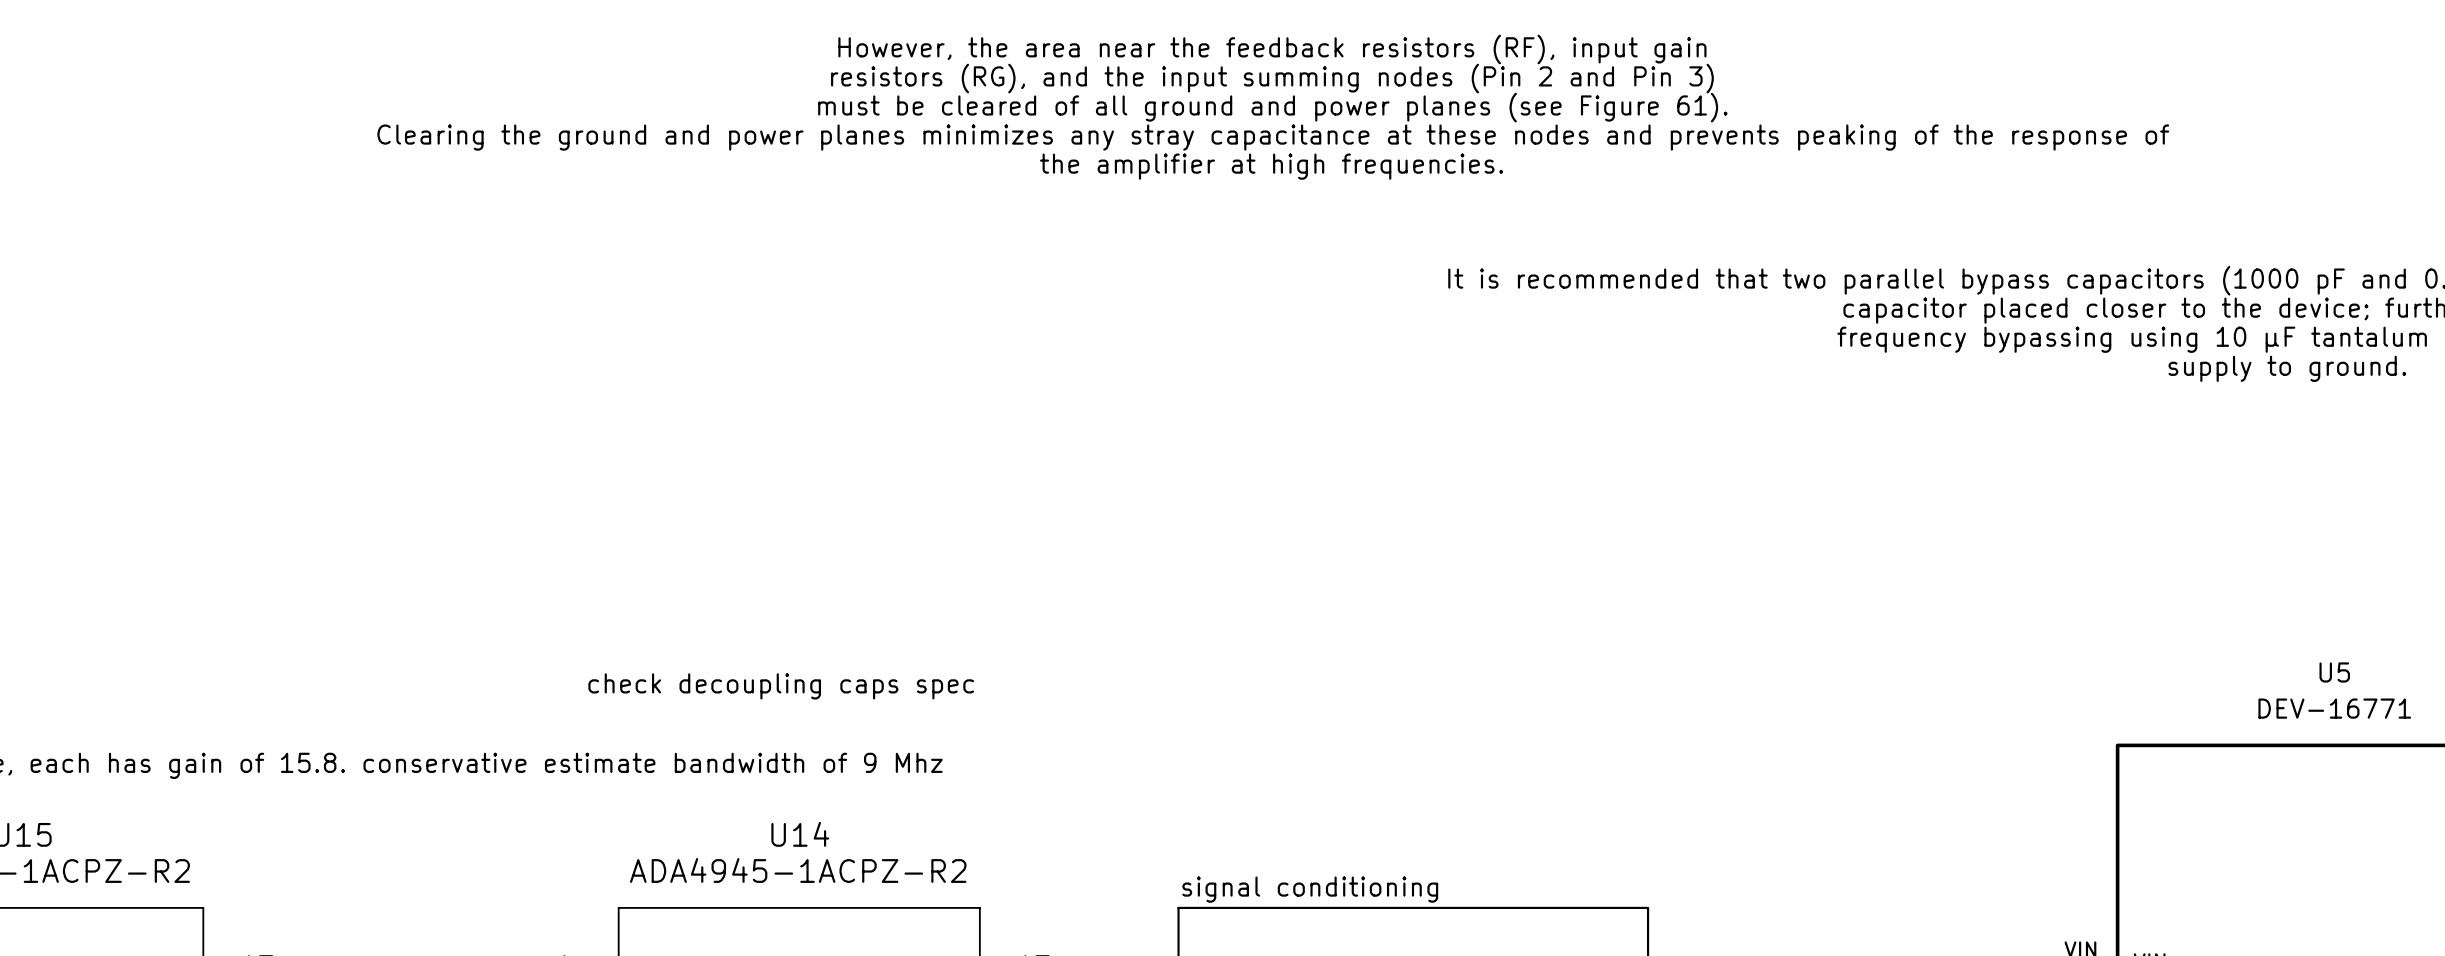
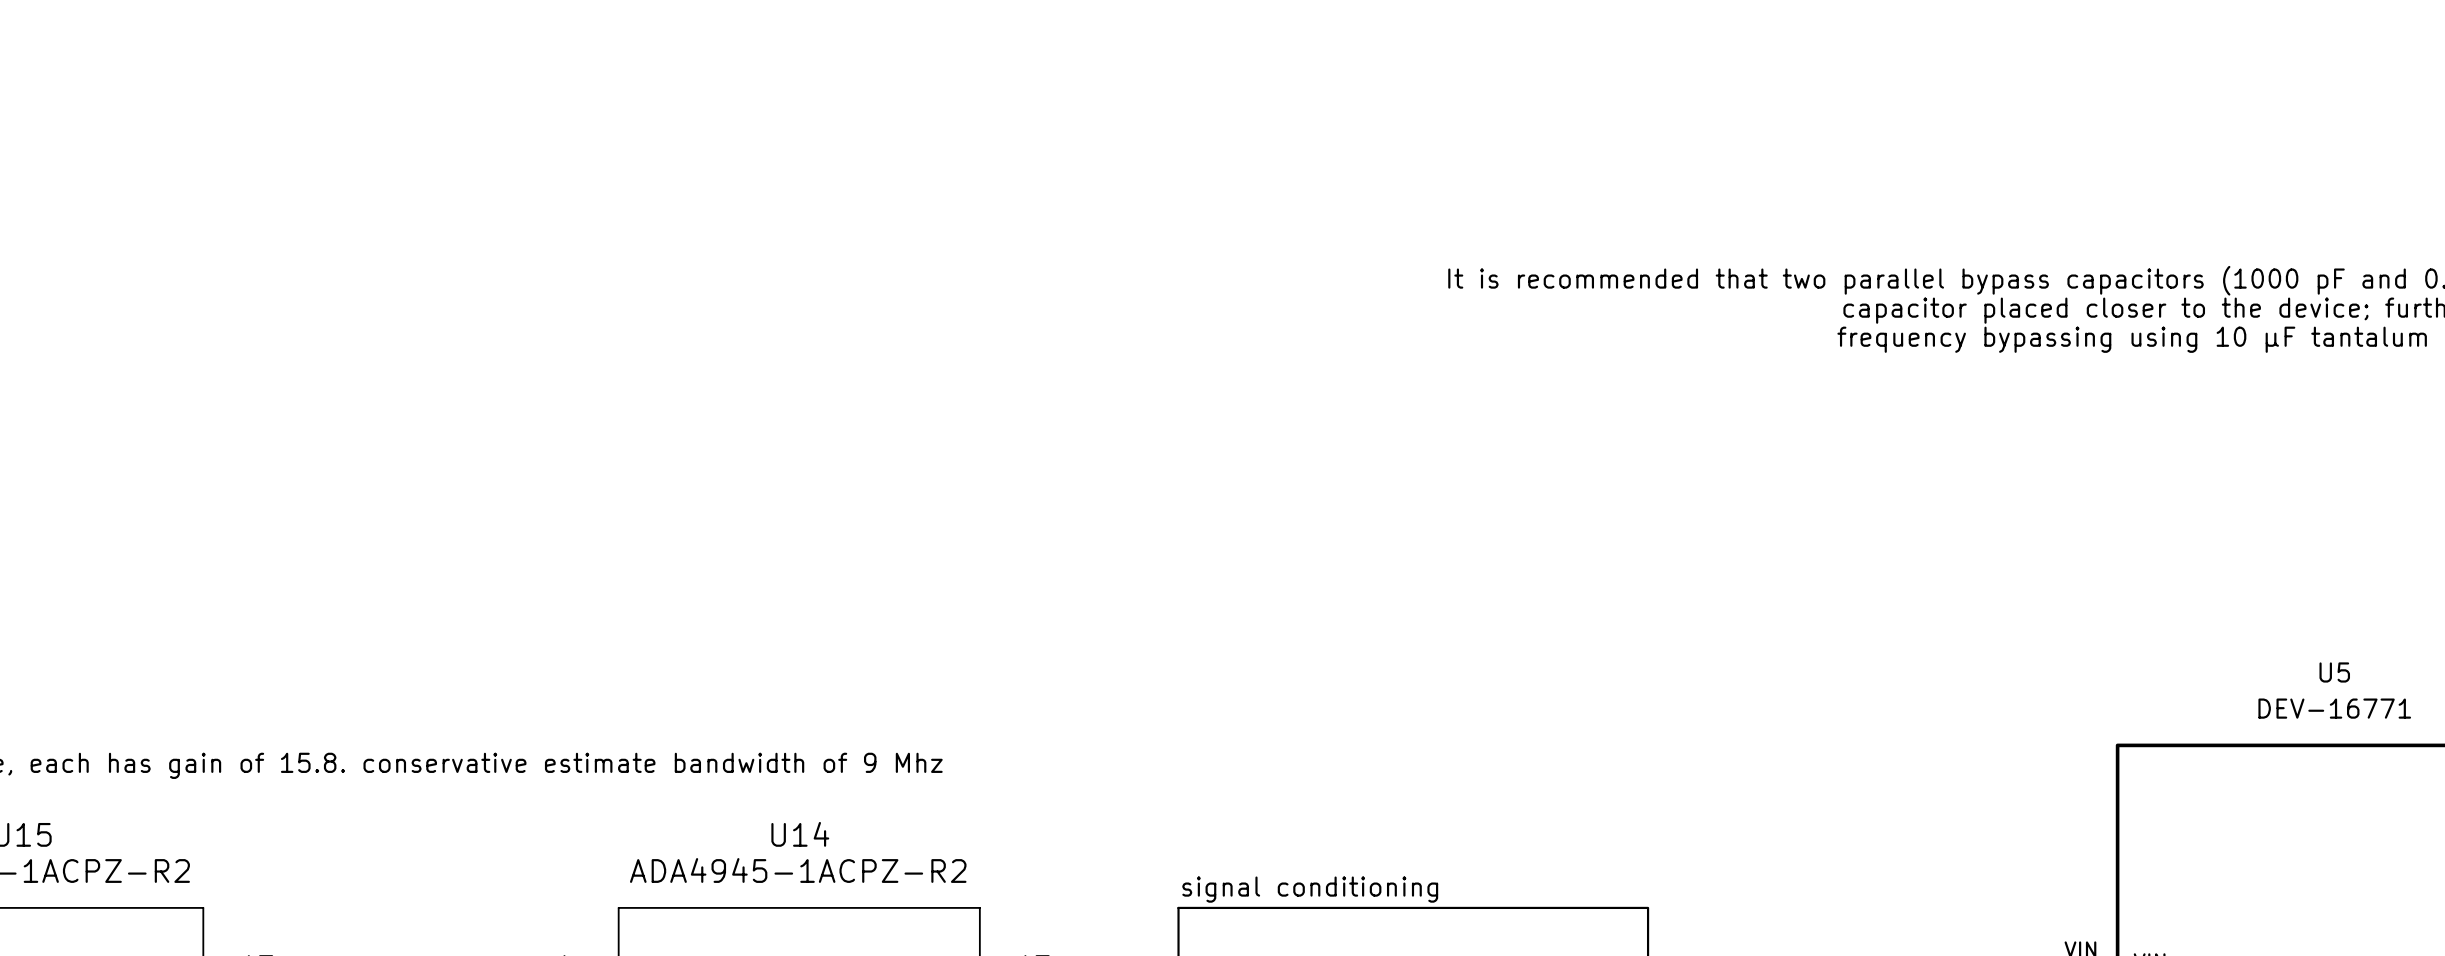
text: However, the area near the feedback resistors (RF), input gain (1272, 49) -> none
text: resistors (RG), and the input summing nodes (Pin 2 and Pin 3) (1272, 78) -> none
text: must be cleared of all ground and power planes (see Figure 61). (1272, 107) -> none
text: Clearing the ground and power planes minimizes any stray capacitance at these nodes and prevents peaking of the response of (1273, 137) -> none
text: the amplifier at high frequencies. (1271, 166) -> none
text: supply to ground. (2287, 368) -> none
text: check decoupling caps spec (781, 686) -> none

